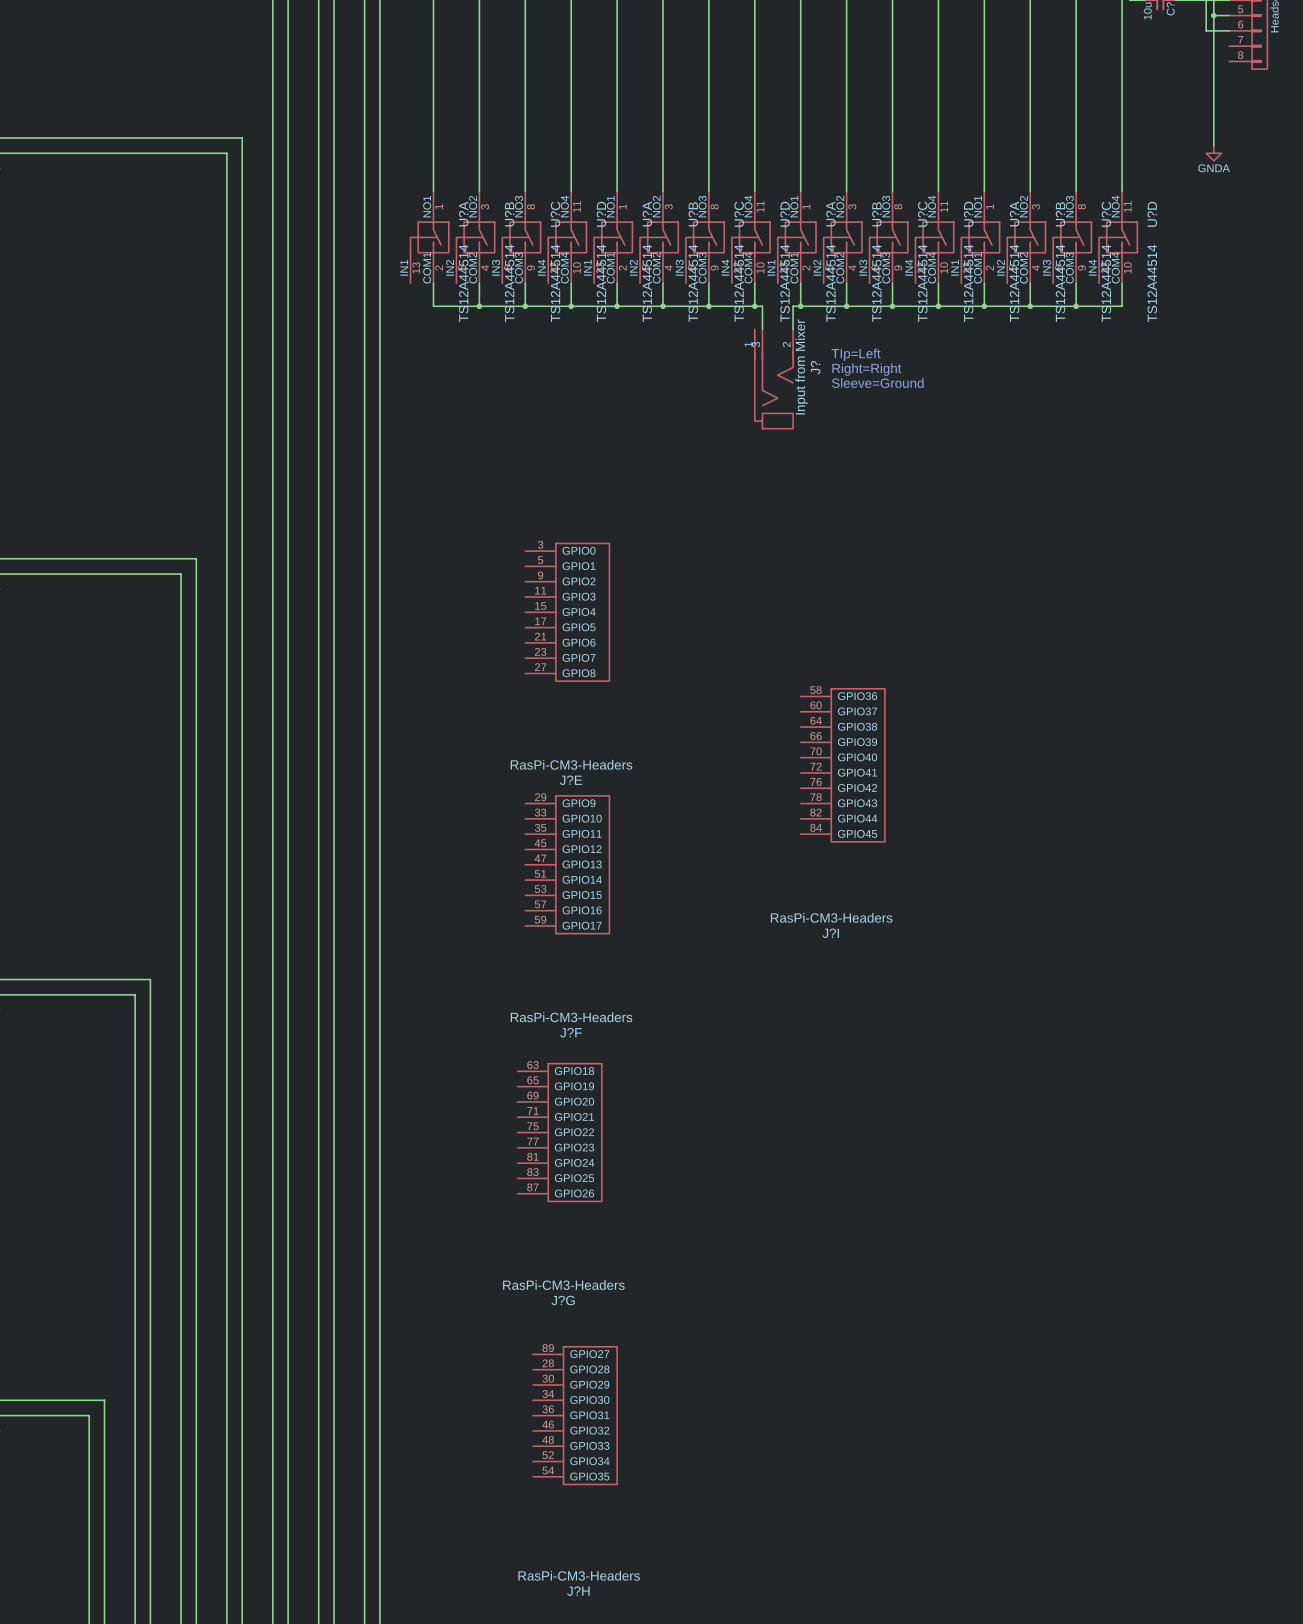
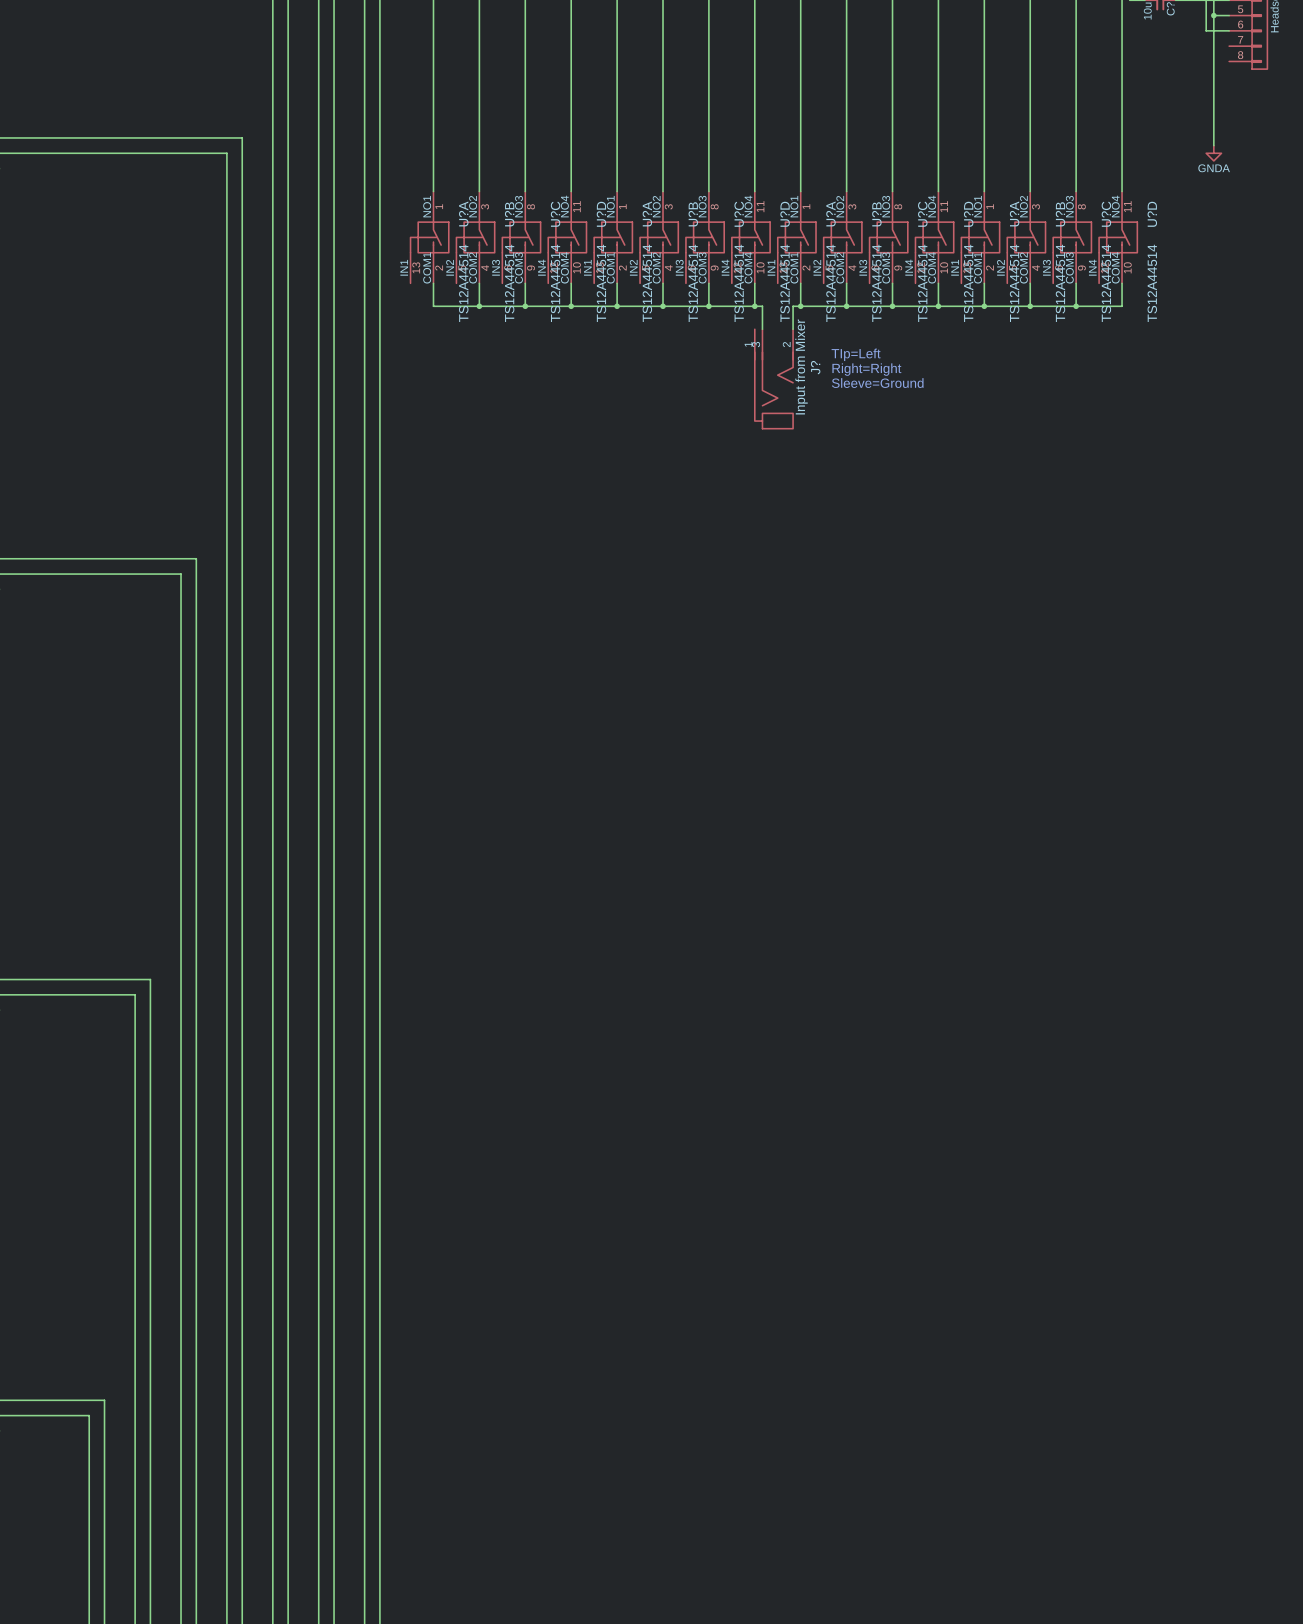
J?E: RasPi-CM3-Headers (567, 612) -> none
J?I: RasPi-CM3-Headers (842, 765) -> none
J?F: RasPi-CM3-Headers (567, 864) -> none
J?G: RasPi-CM3-Headers (559, 1132) -> none
J?H: RasPi-CM3-Headers (575, 1415) -> none

